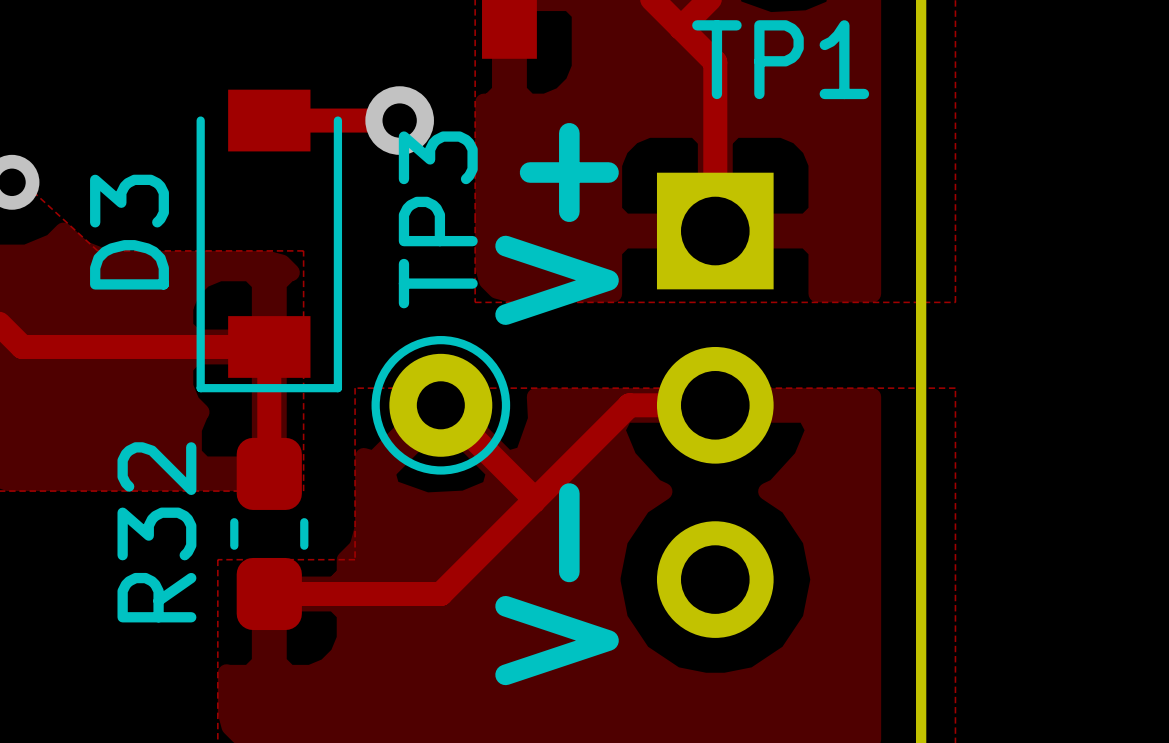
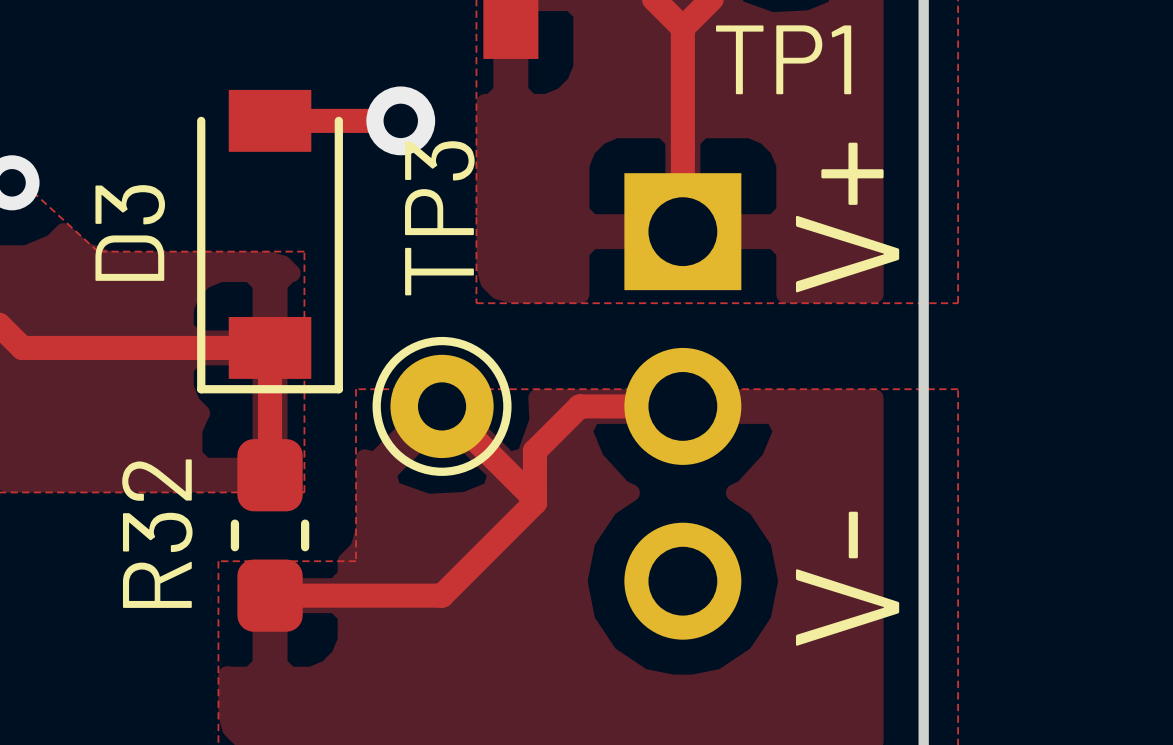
track: (680, 27) (715, 62) (715, 231) -> (682, 28) (682, 231)
text position: V+ (557, 223) -> V+ (847, 217)
track: (629, 405) (533, 501) -> (631, 406) (579, 406) (534, 451) (534, 499)
part position: (715, 405) -> (682, 406)
text position: V- (557, 584) -> V- (847, 578)

